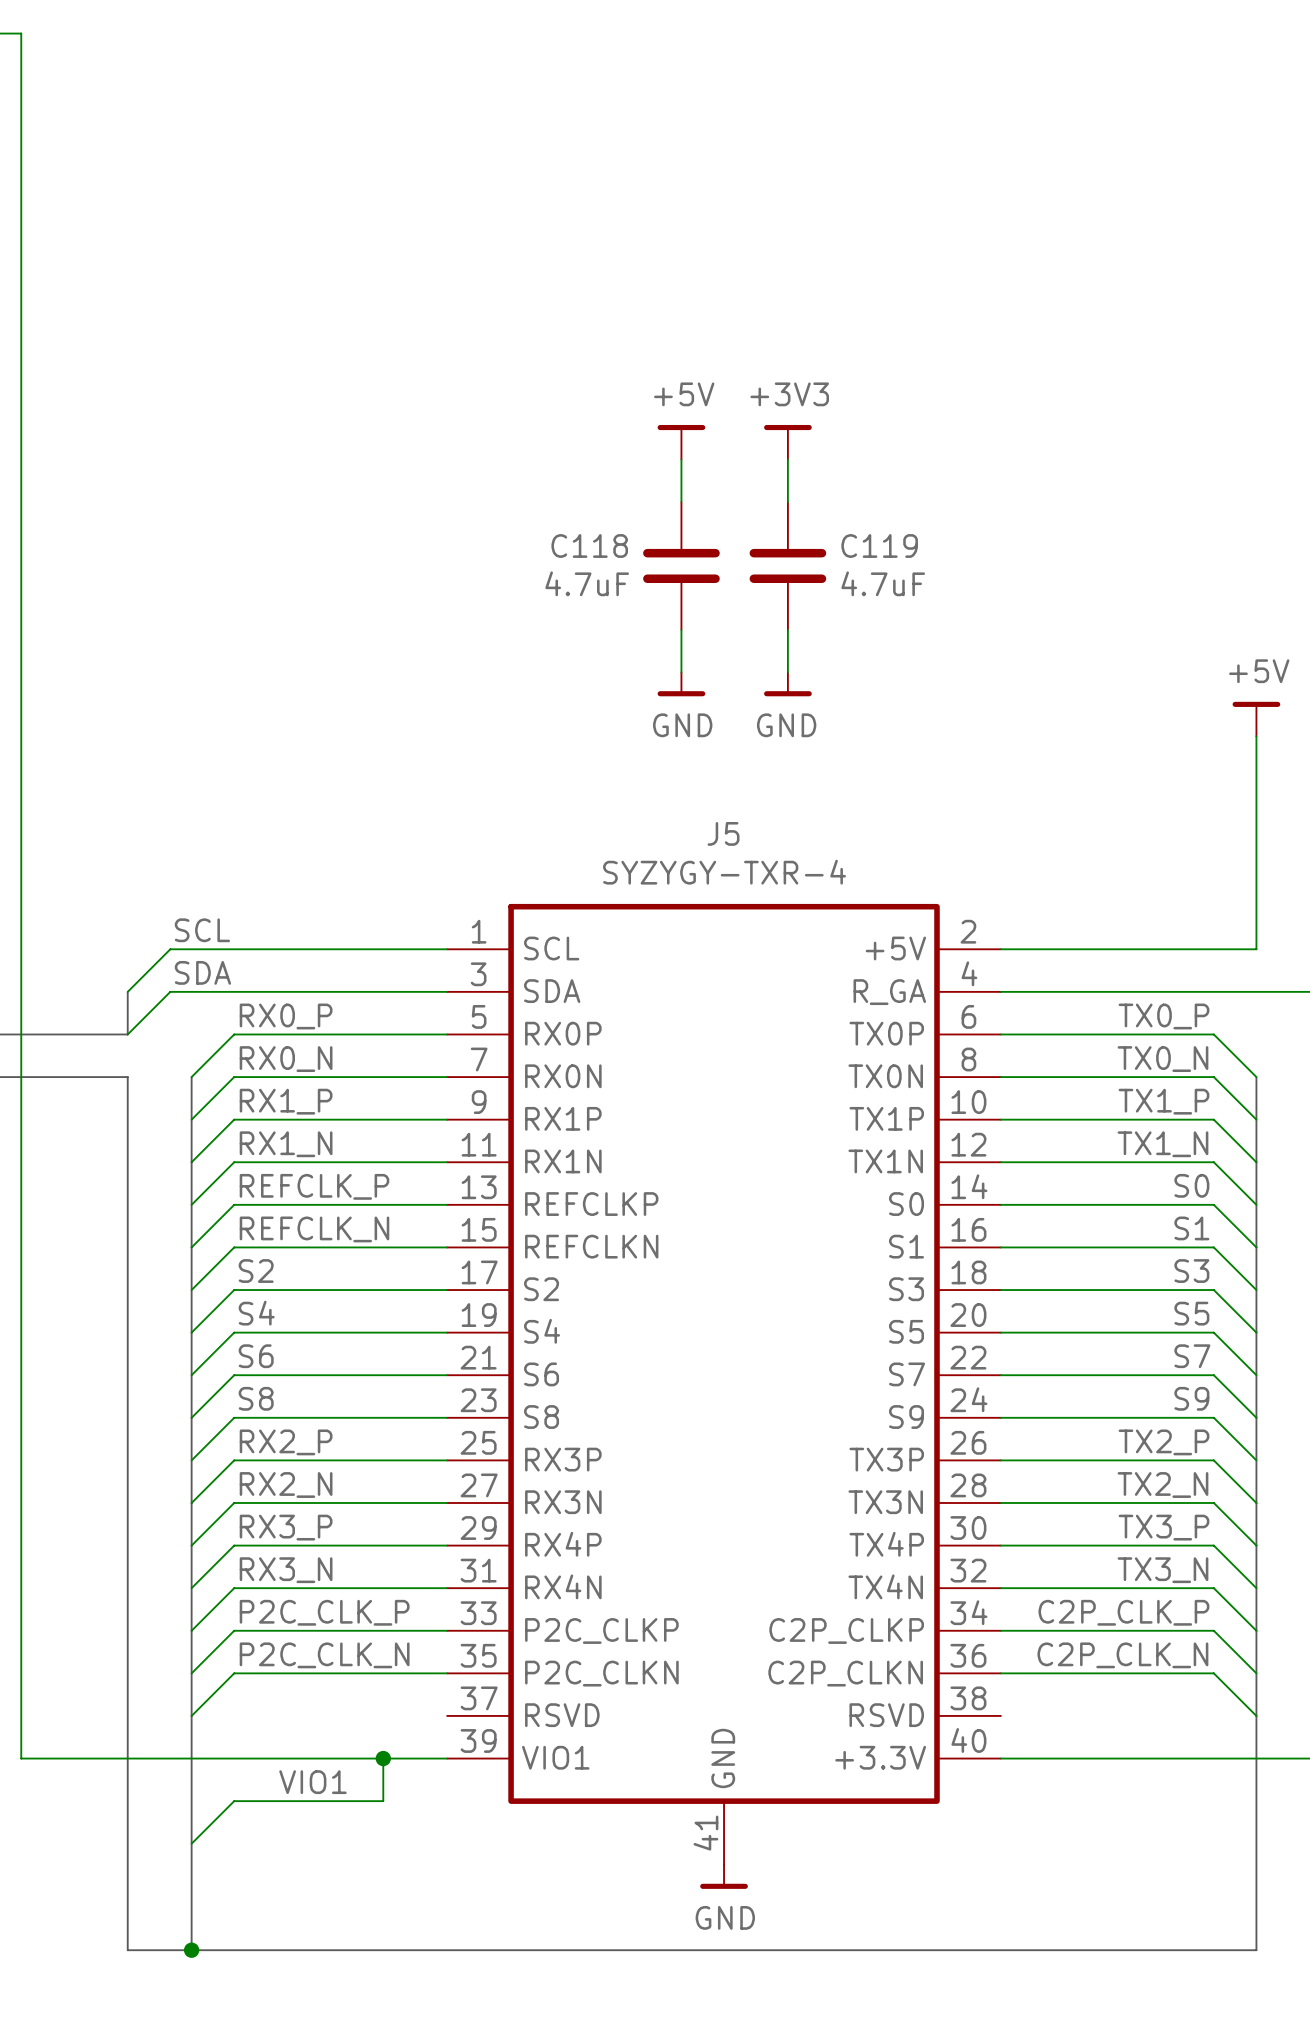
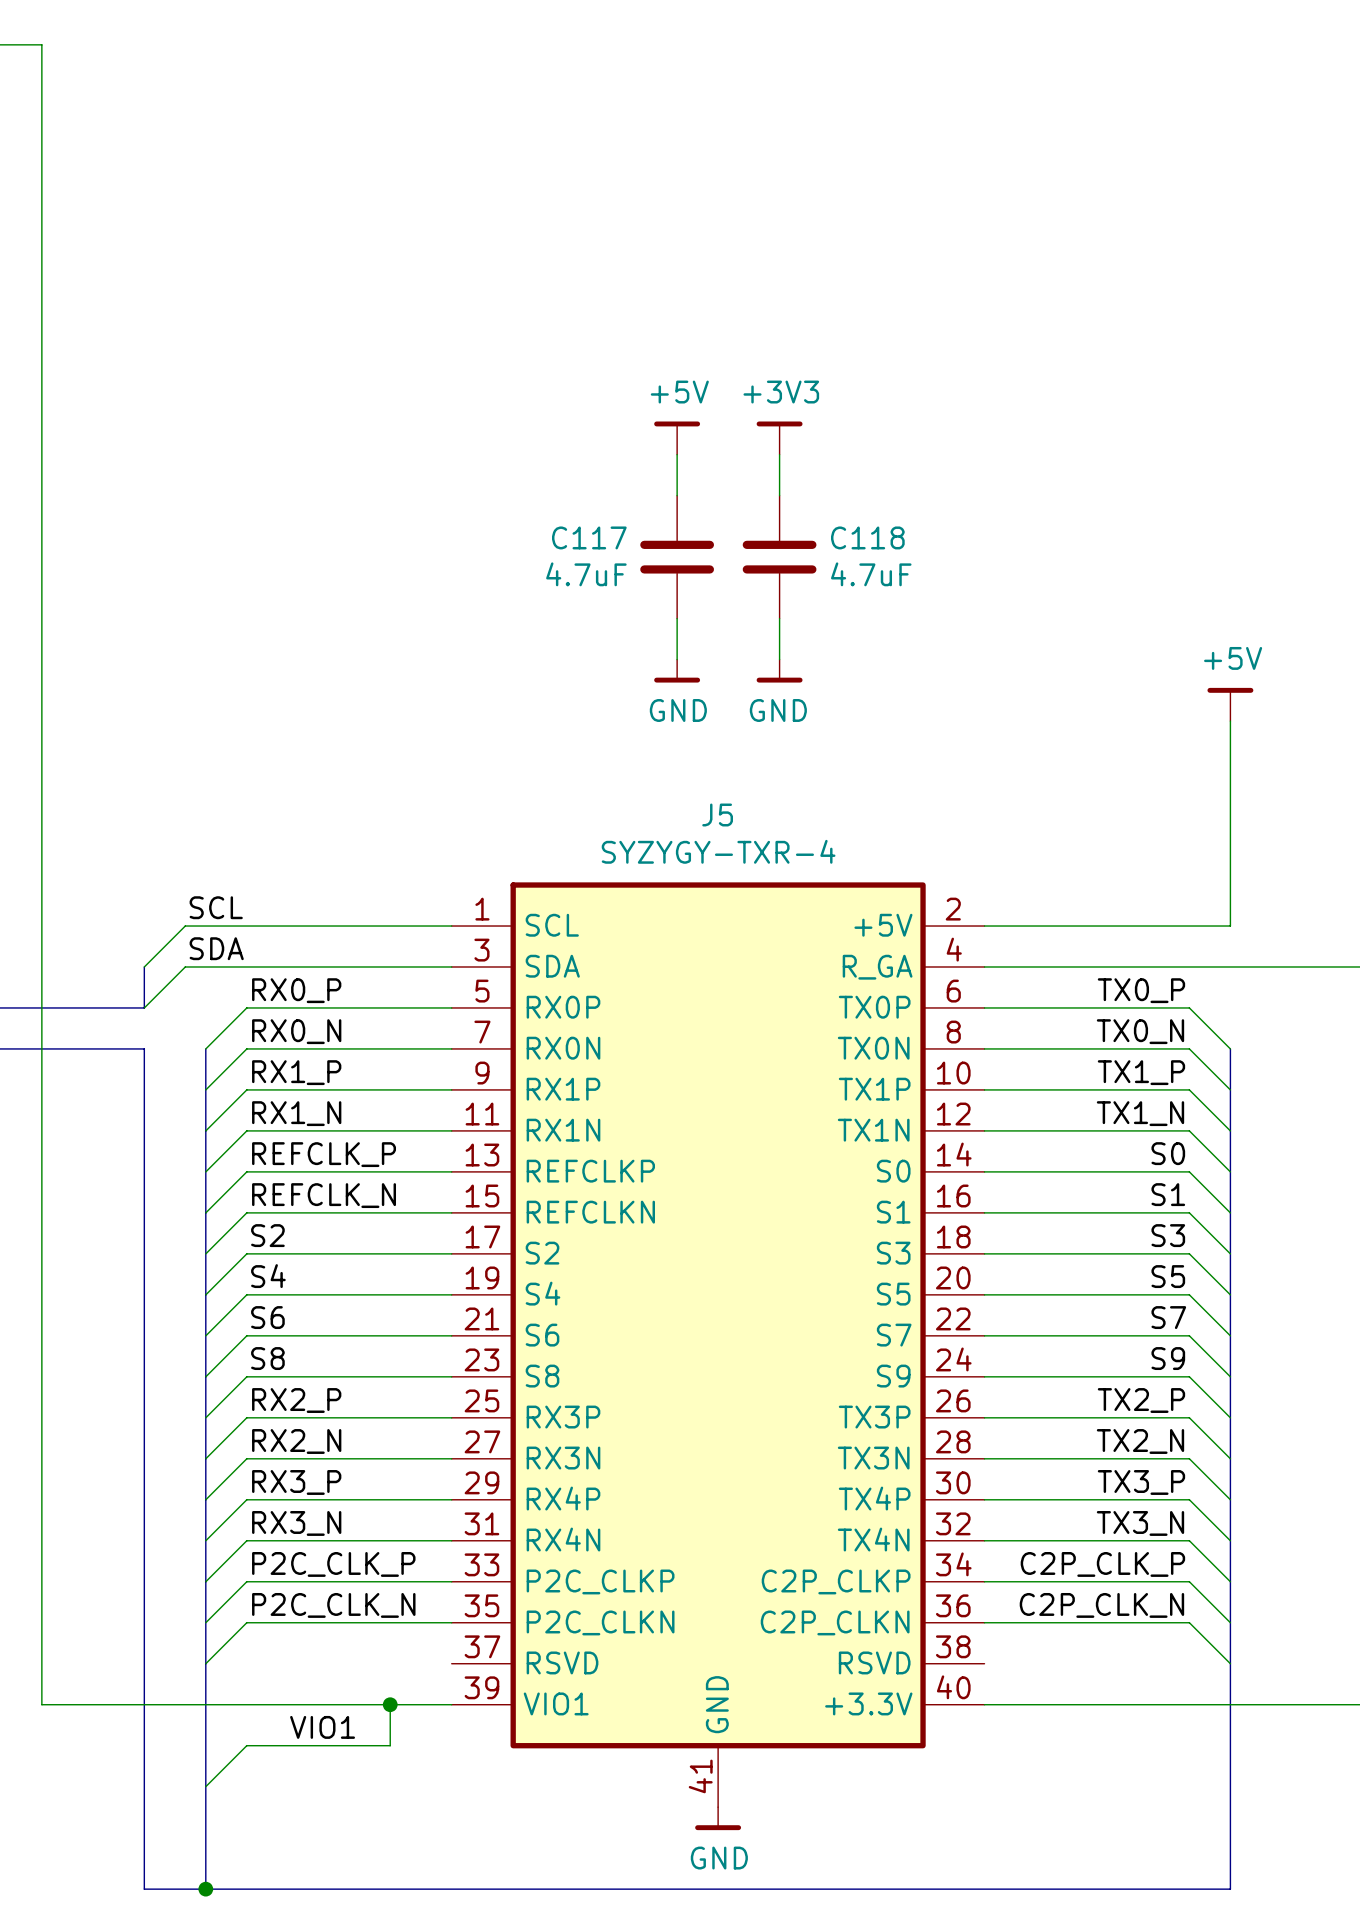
C118 name: C118 (589, 545) -> C117 (589, 537)
C119 name: C119 (879, 545) -> C118 (867, 537)

